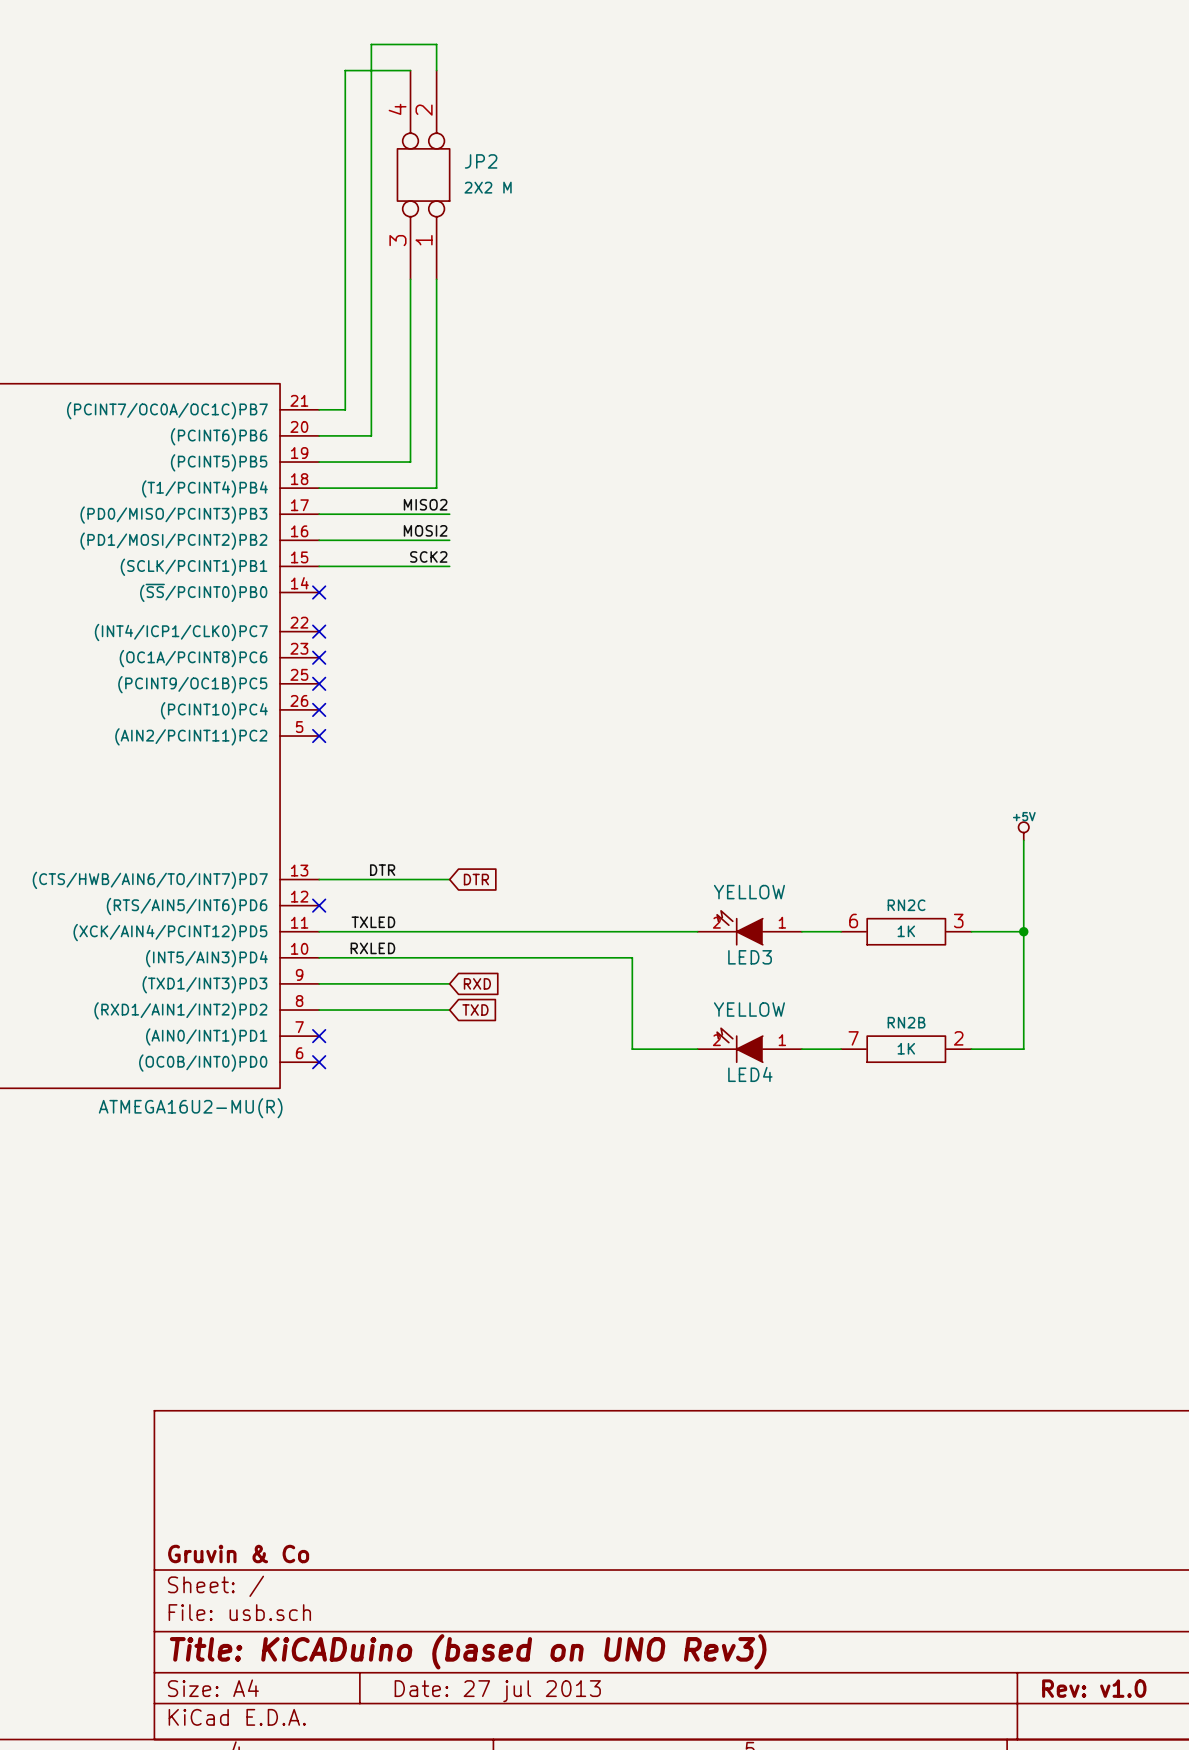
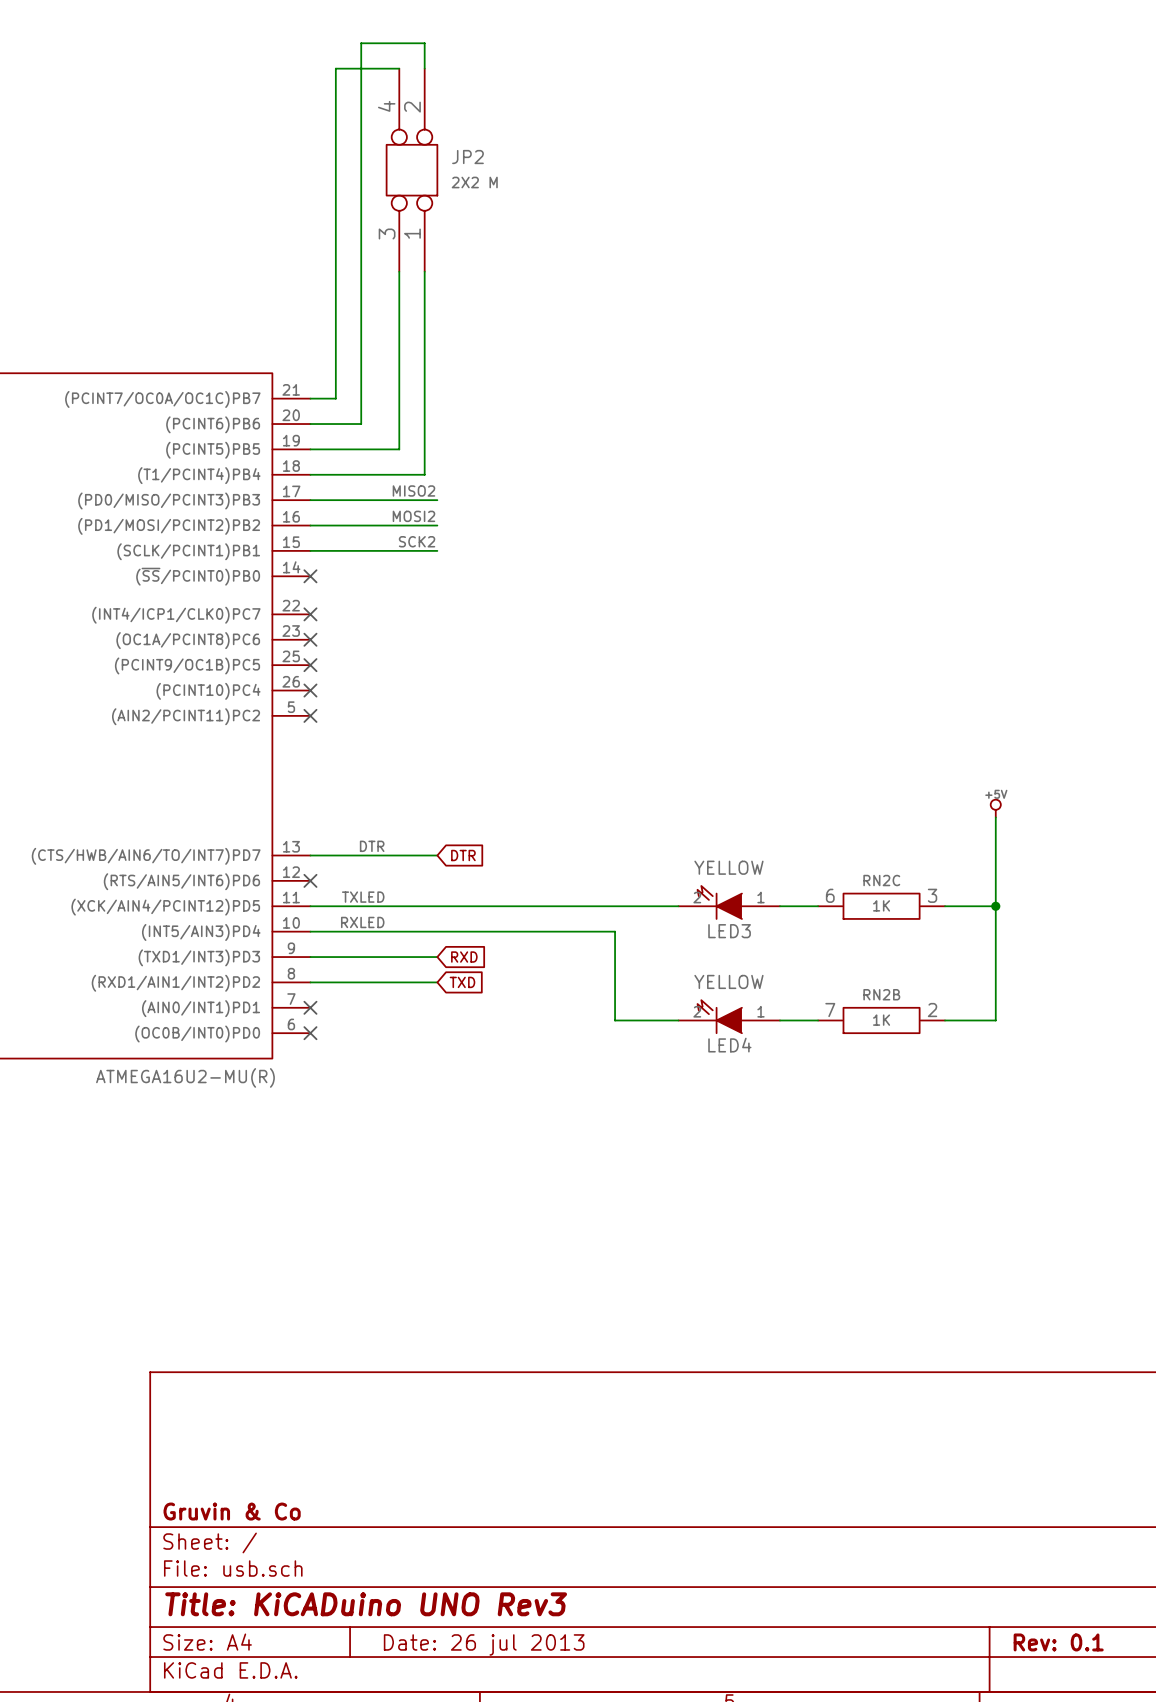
title block: Title: KiCADuino (based on UNO Rev3) (468, 1651) -> Title: KiCADuino UNO Rev3 (366, 1604)
title block: Rev: v1.0 (1094, 1688) -> Rev: 0.1 (1058, 1642)
title block: Date: 27 jul 2013 (497, 1691) -> Date: 26 jul 2013 (484, 1644)

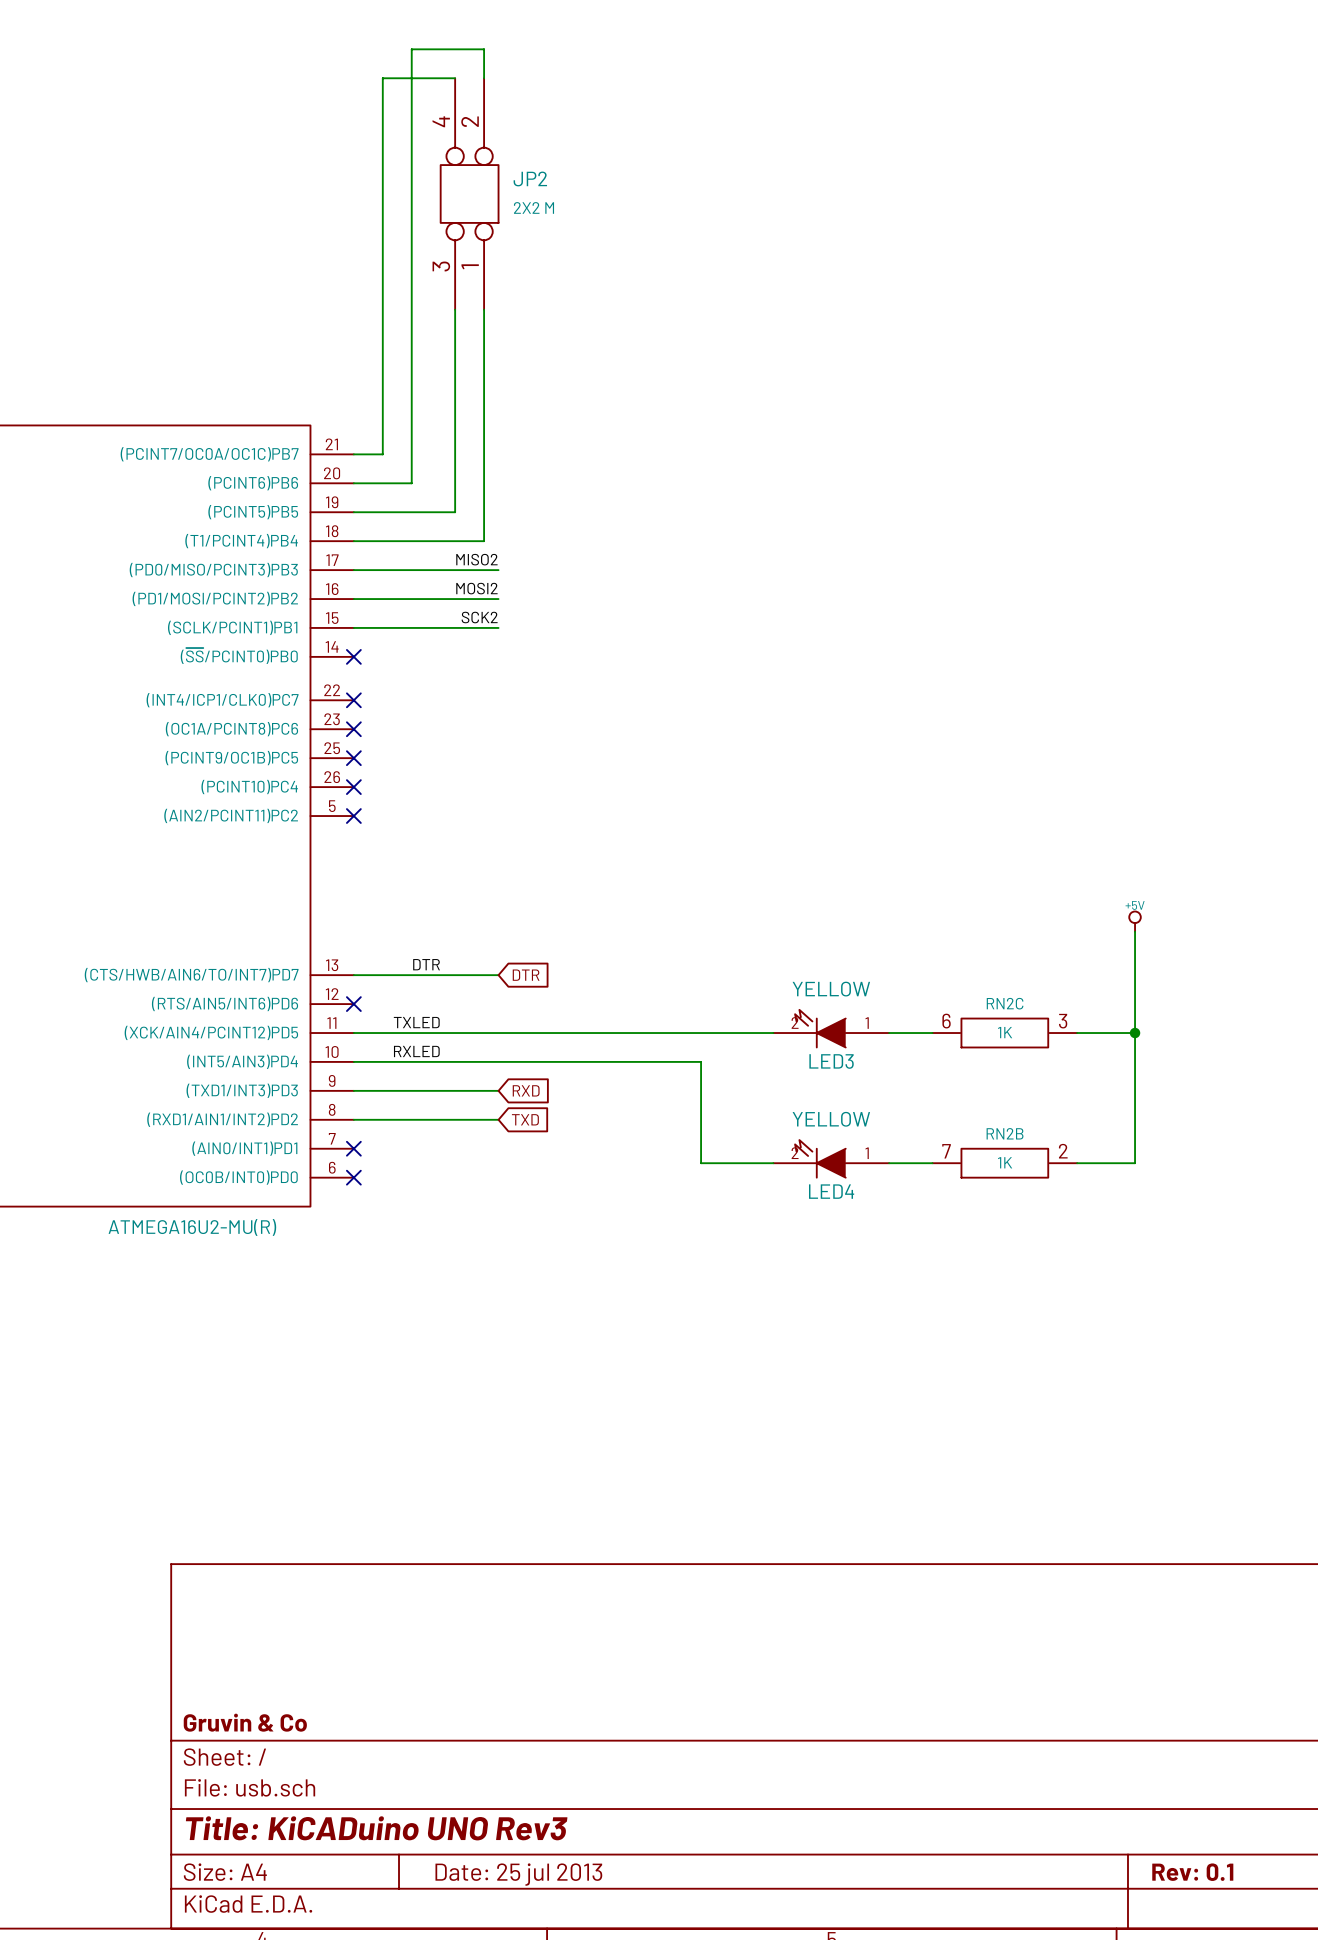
title block: Date: 26 jul 2013 (484, 1644) -> Date: 25 jul 2013 (518, 1874)

